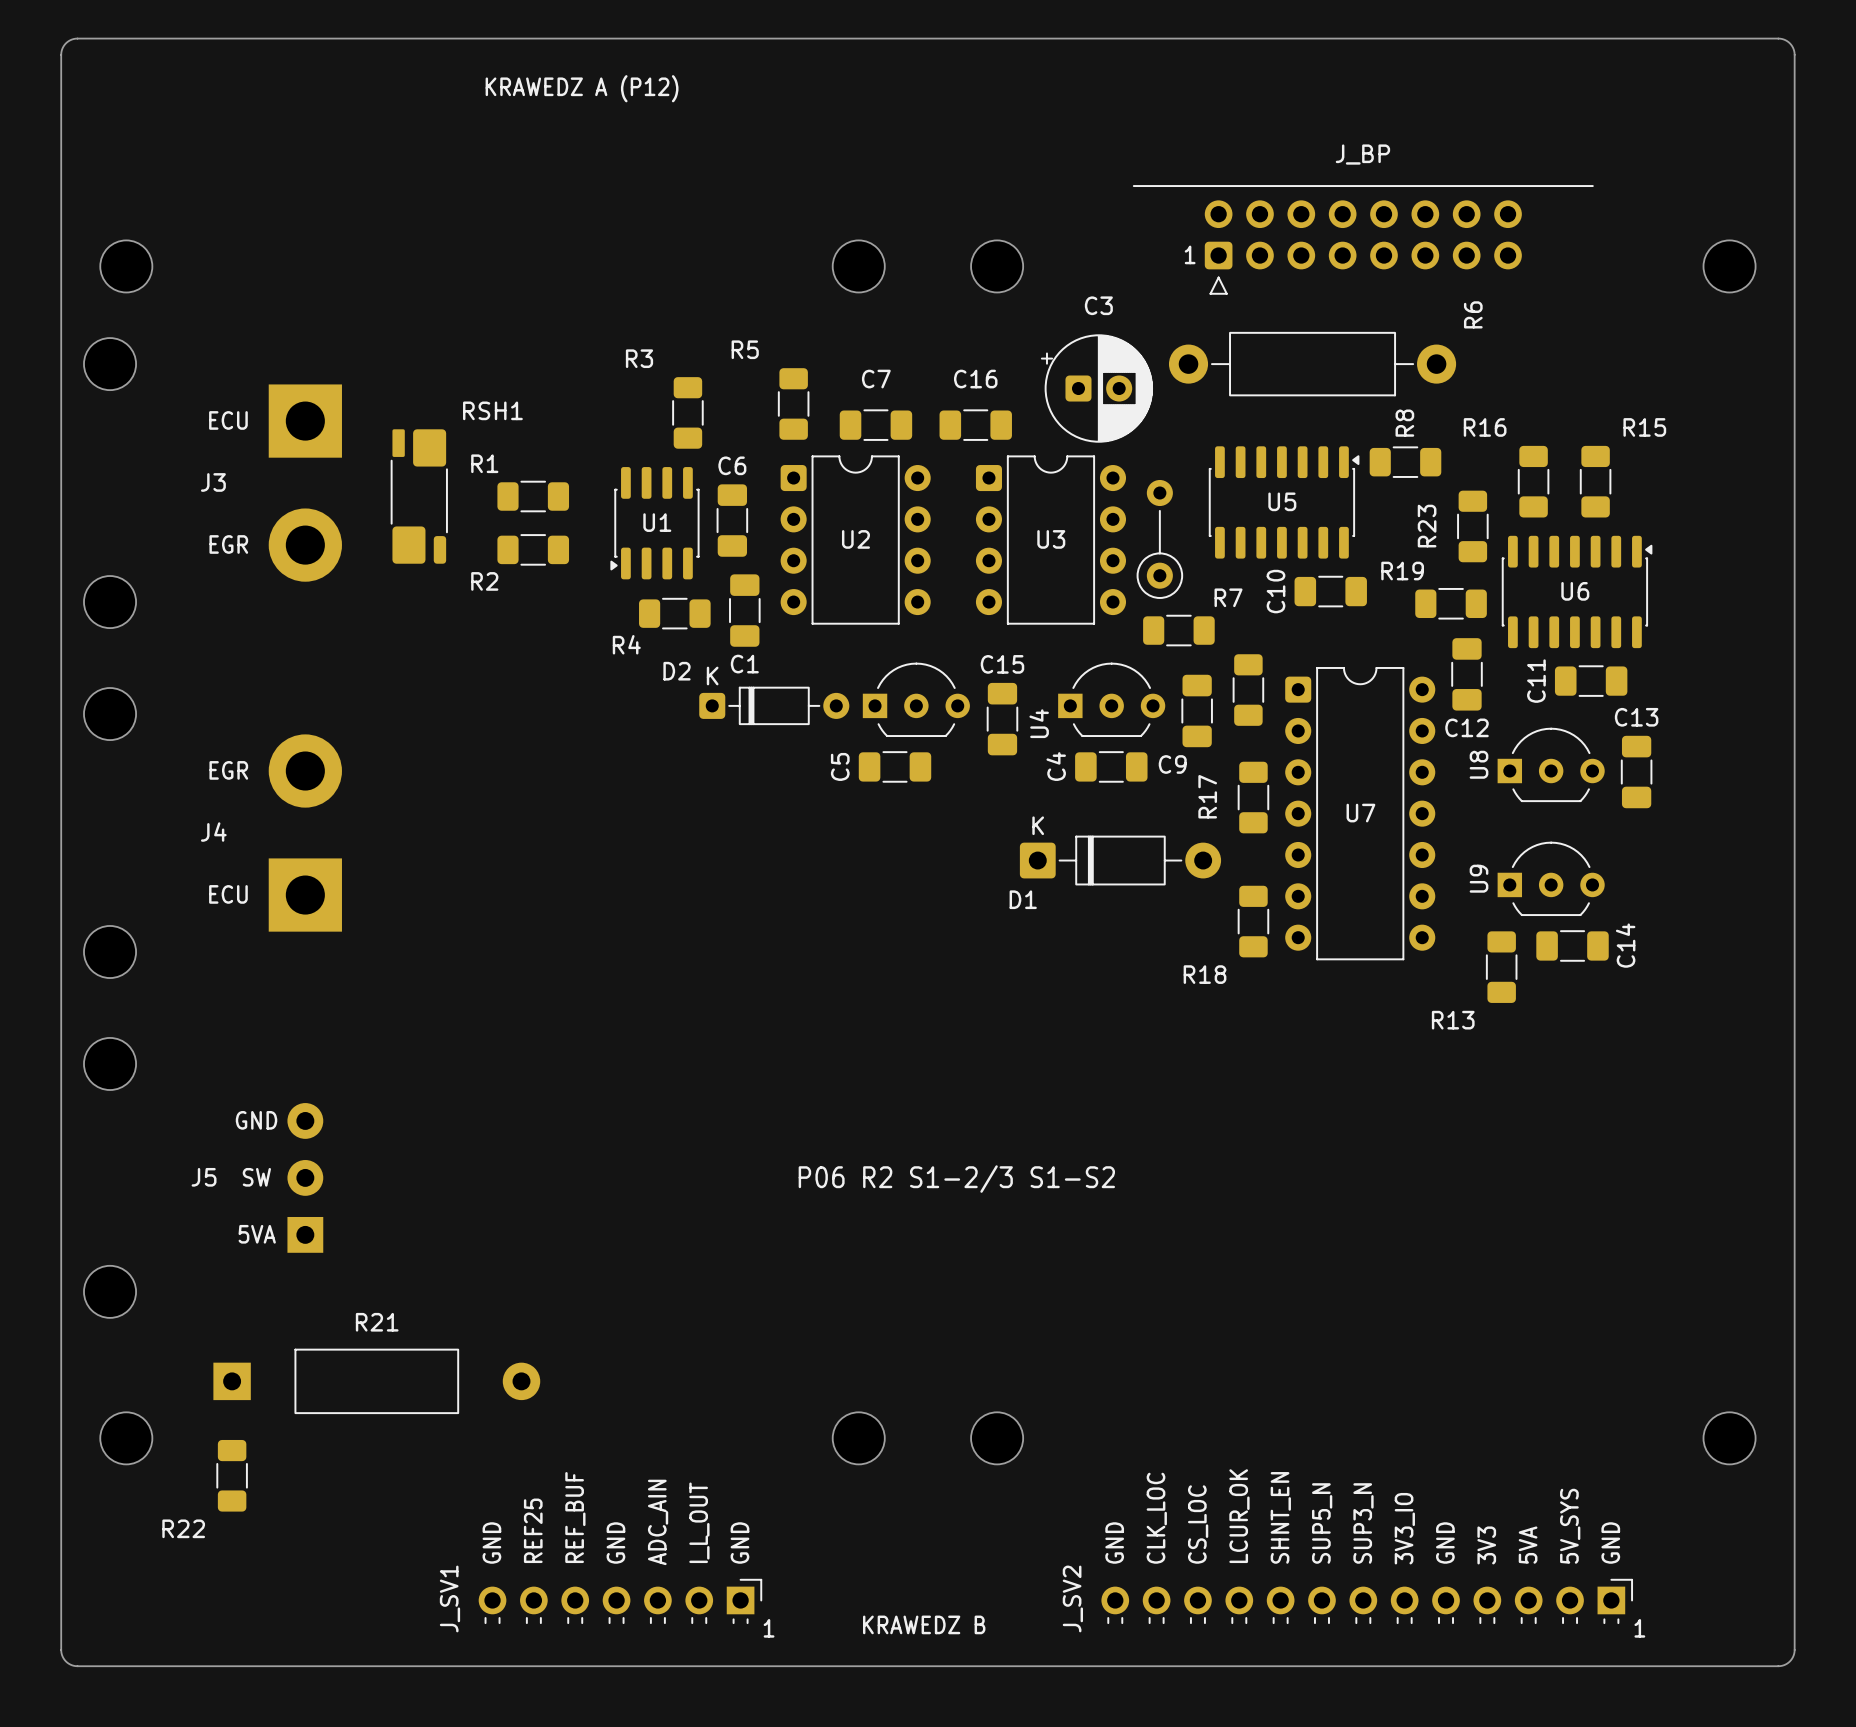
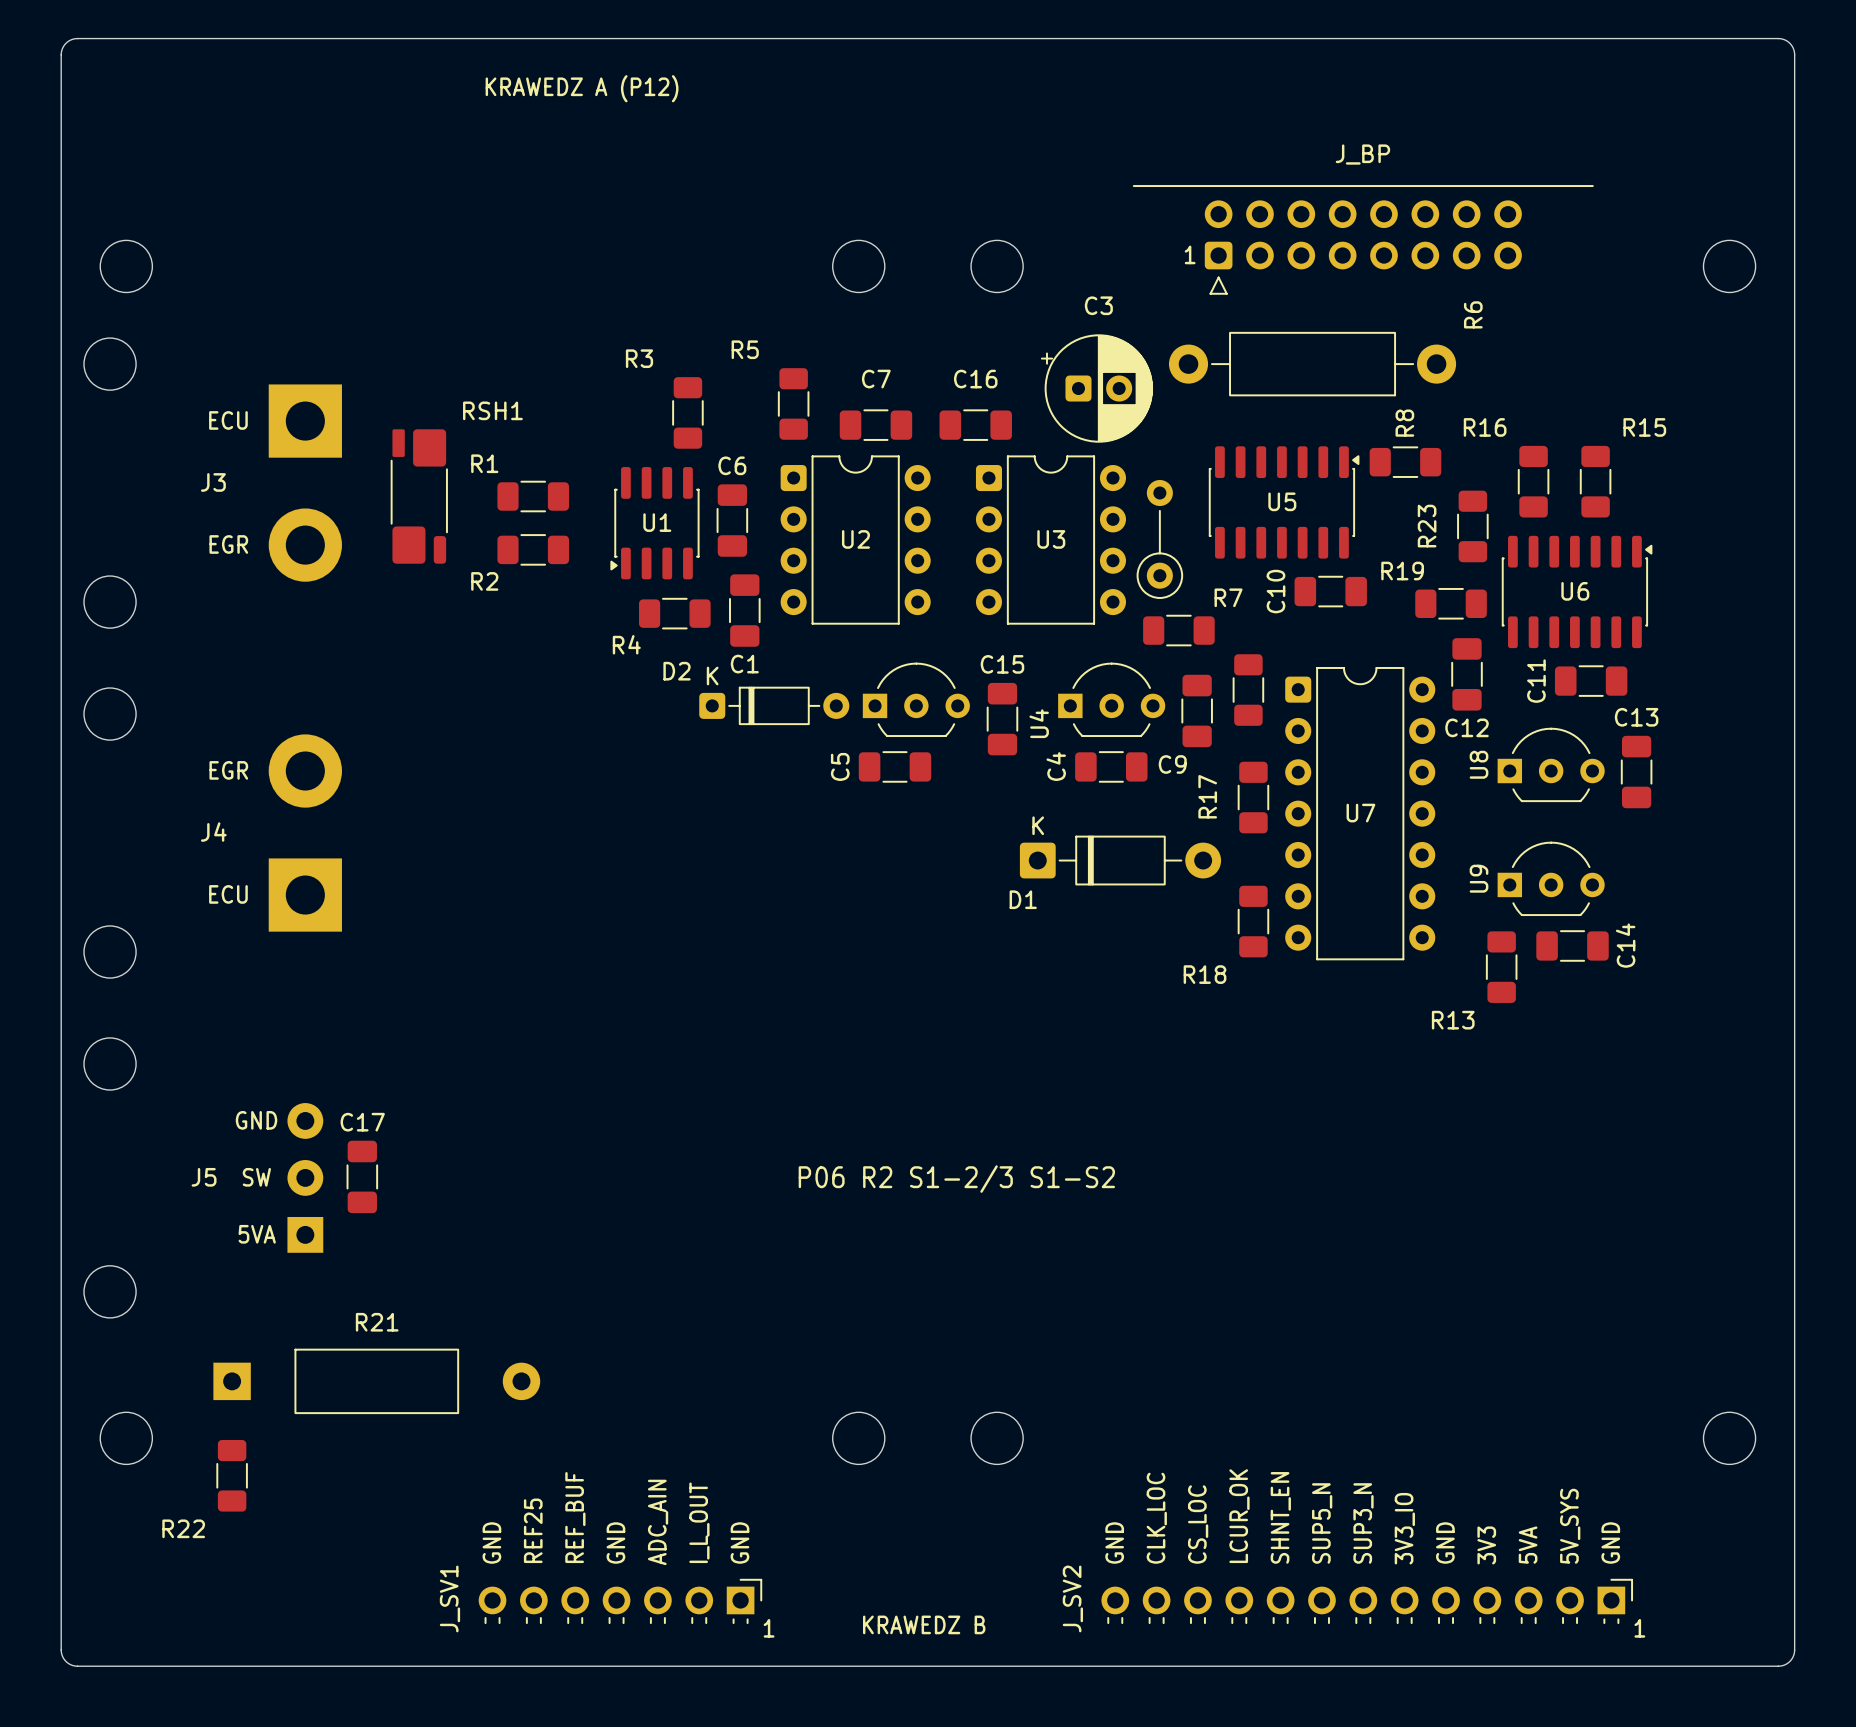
C17: none -> (362, 1176)

